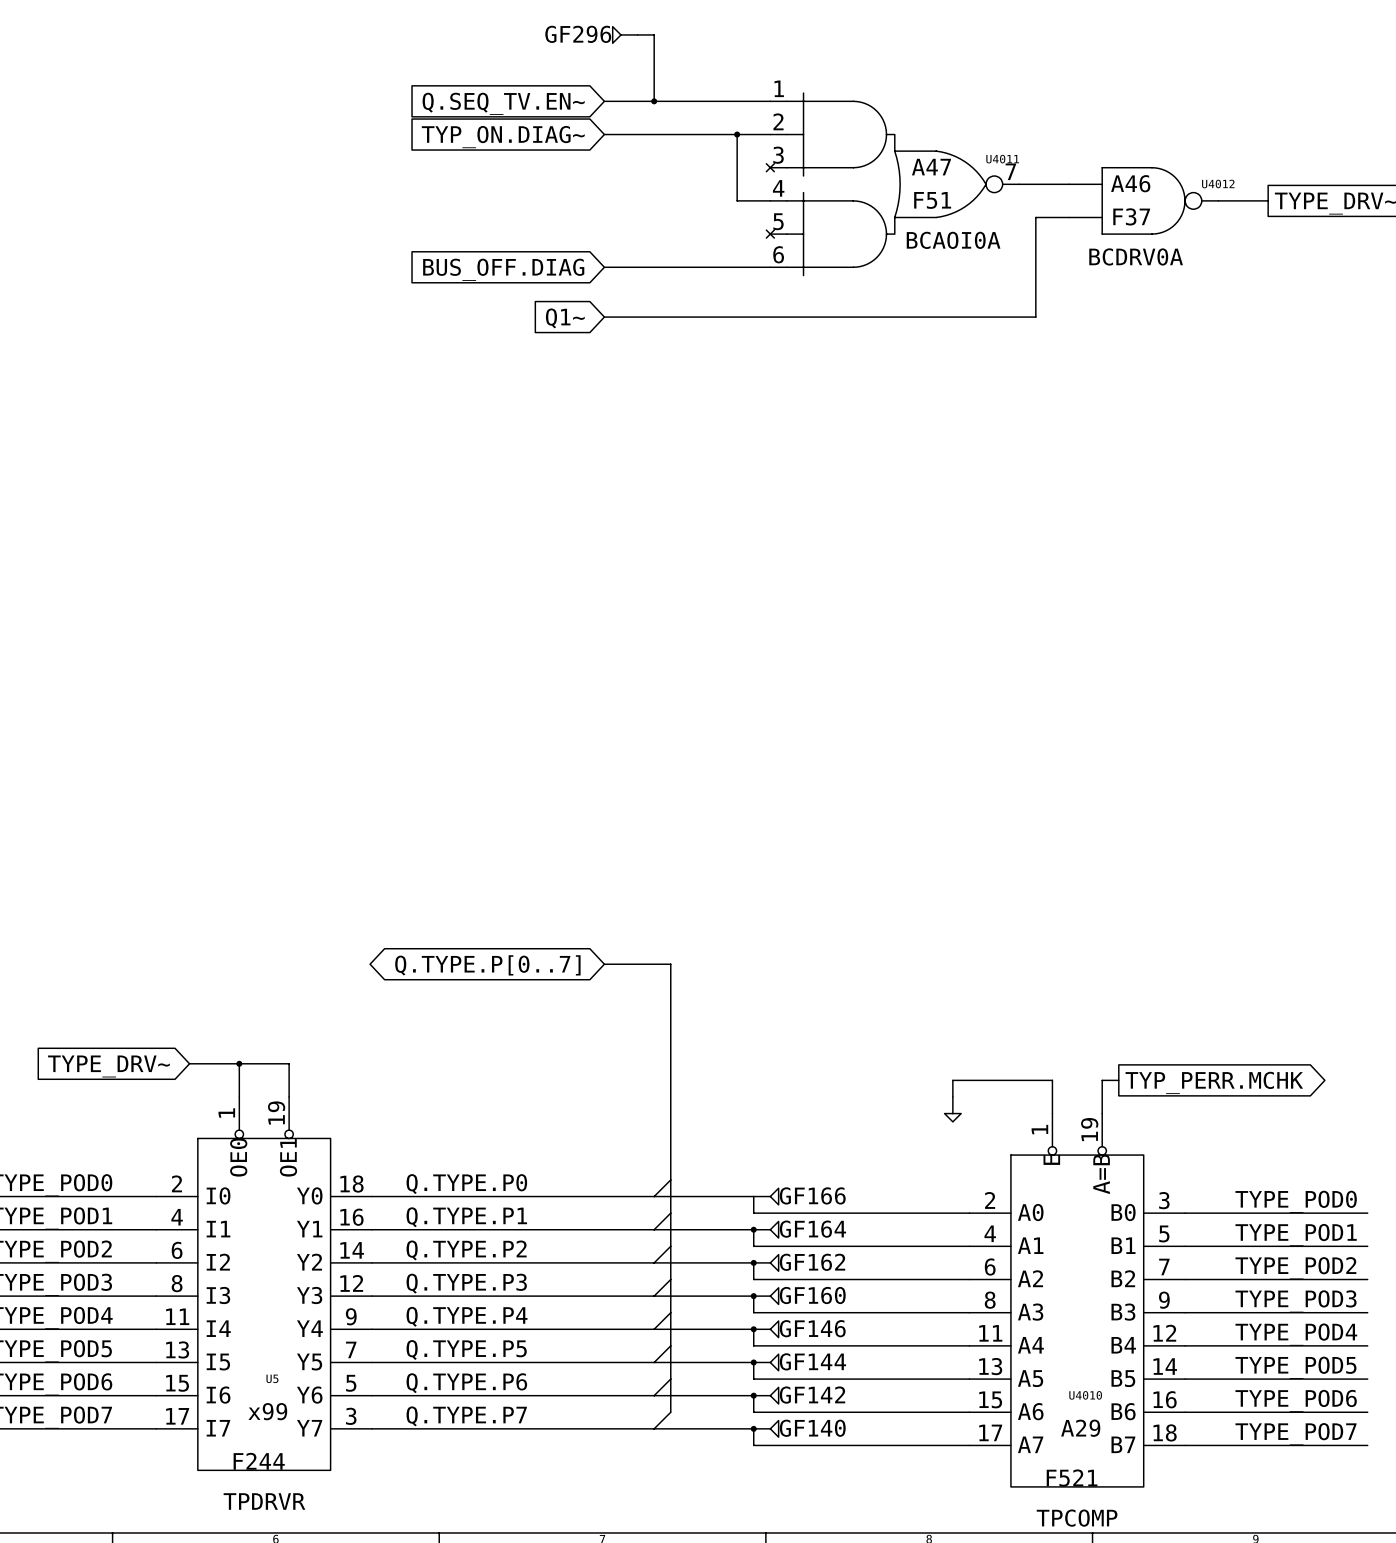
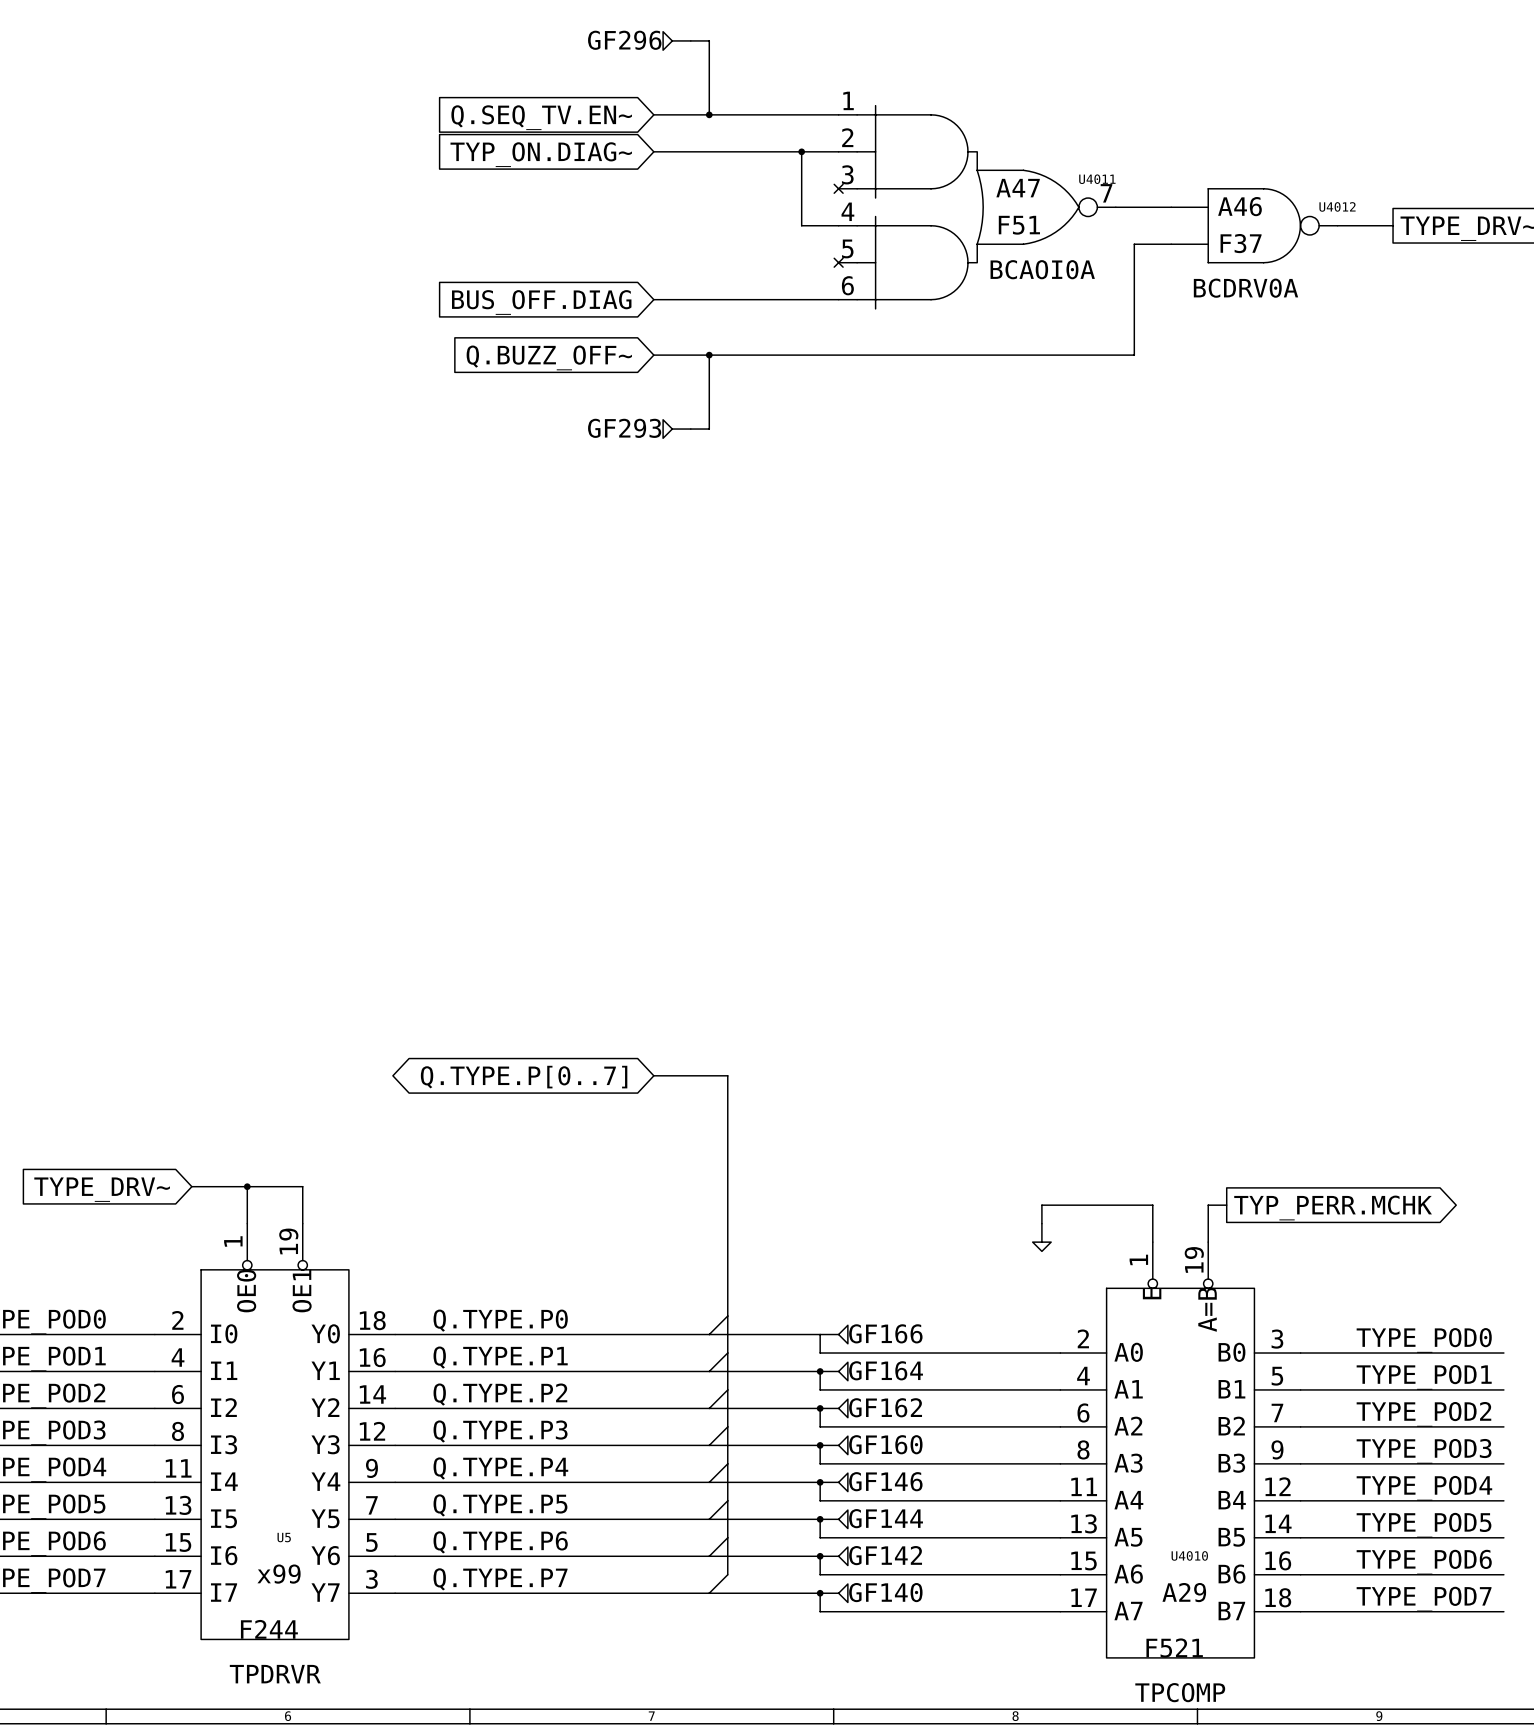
wire: none -> (709, 355) (709, 429) (690, 429)
junction: none -> (709, 355)
global label: Q1~ (565, 318) -> Q.BUZZ_OFF~ (549, 357)
GF293: none -> (676, 429)

